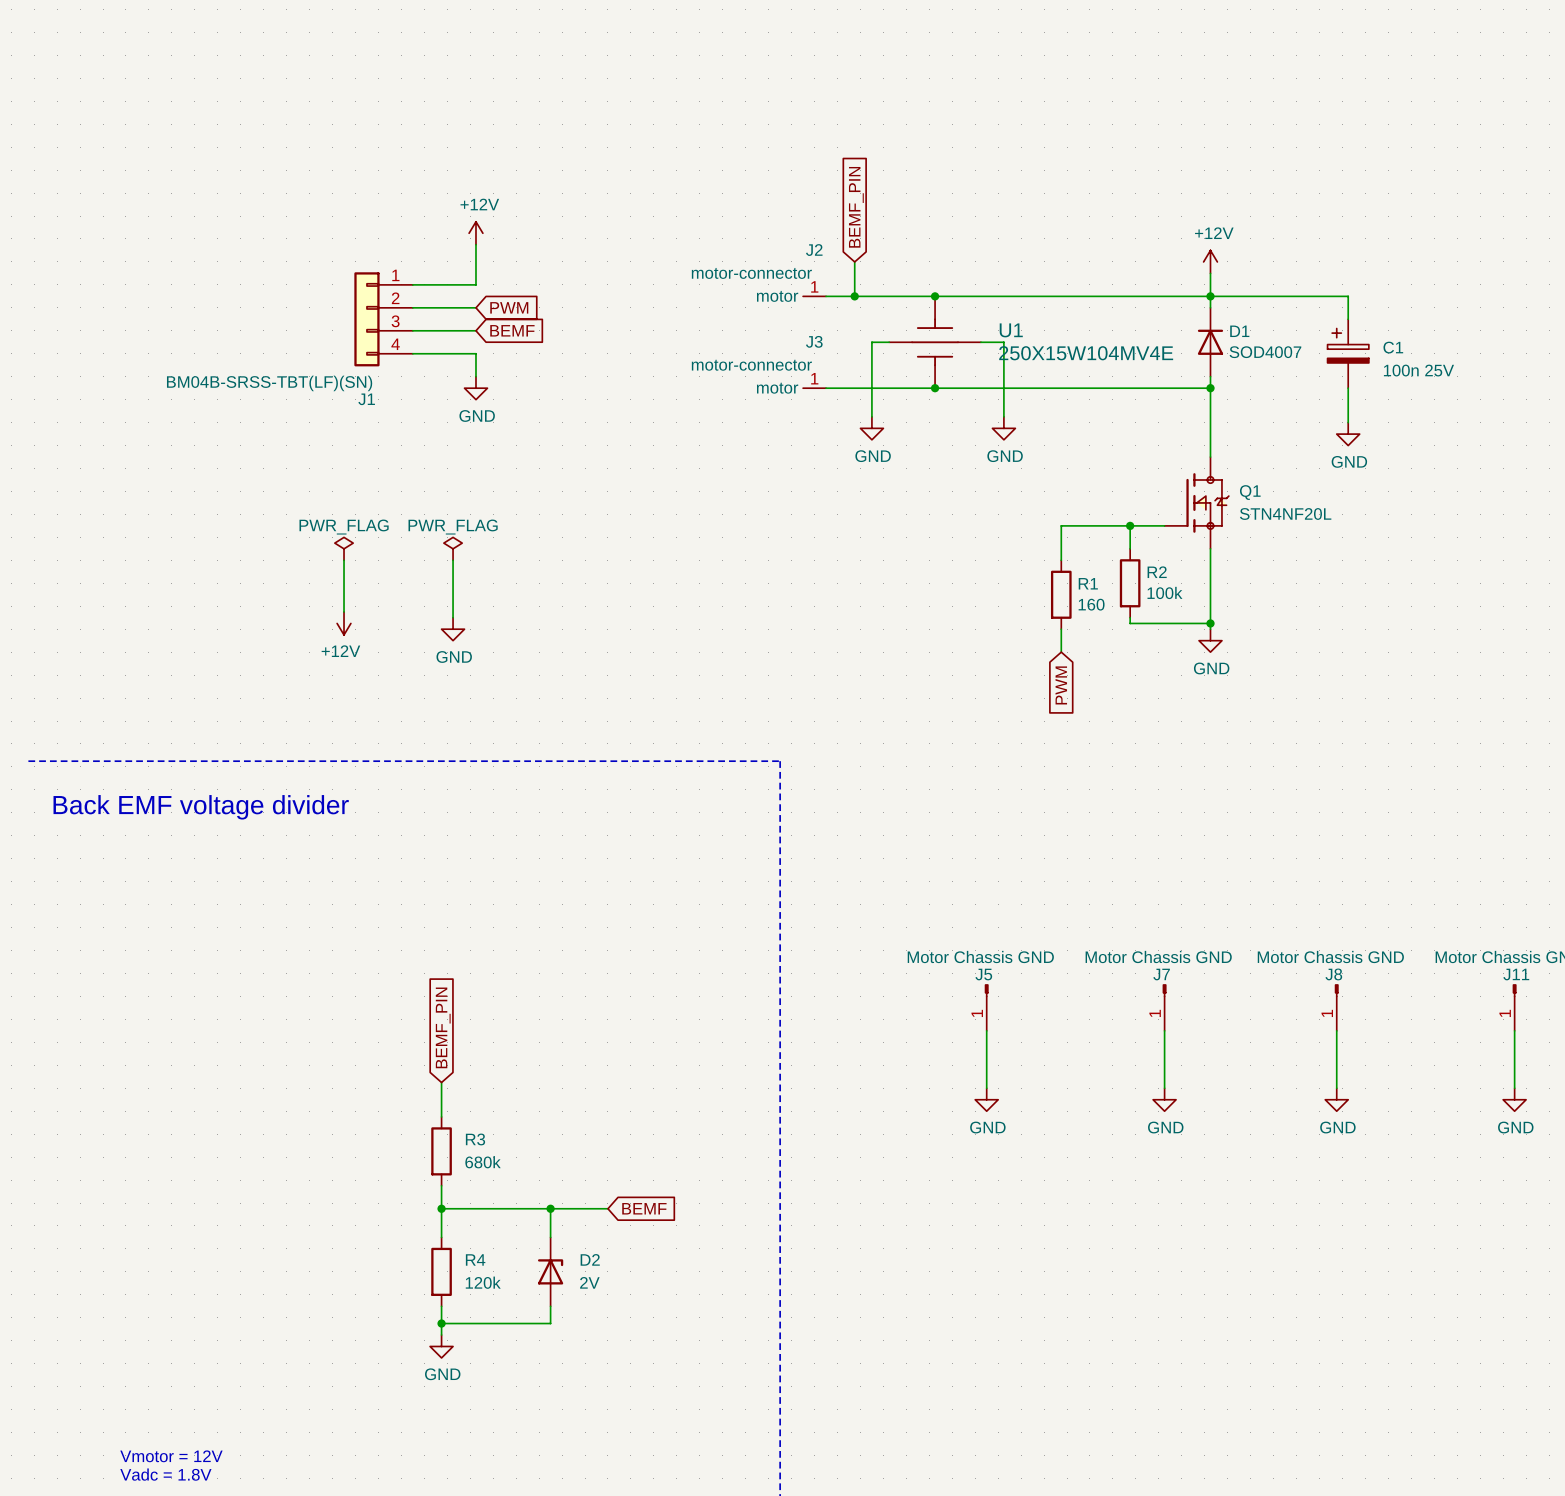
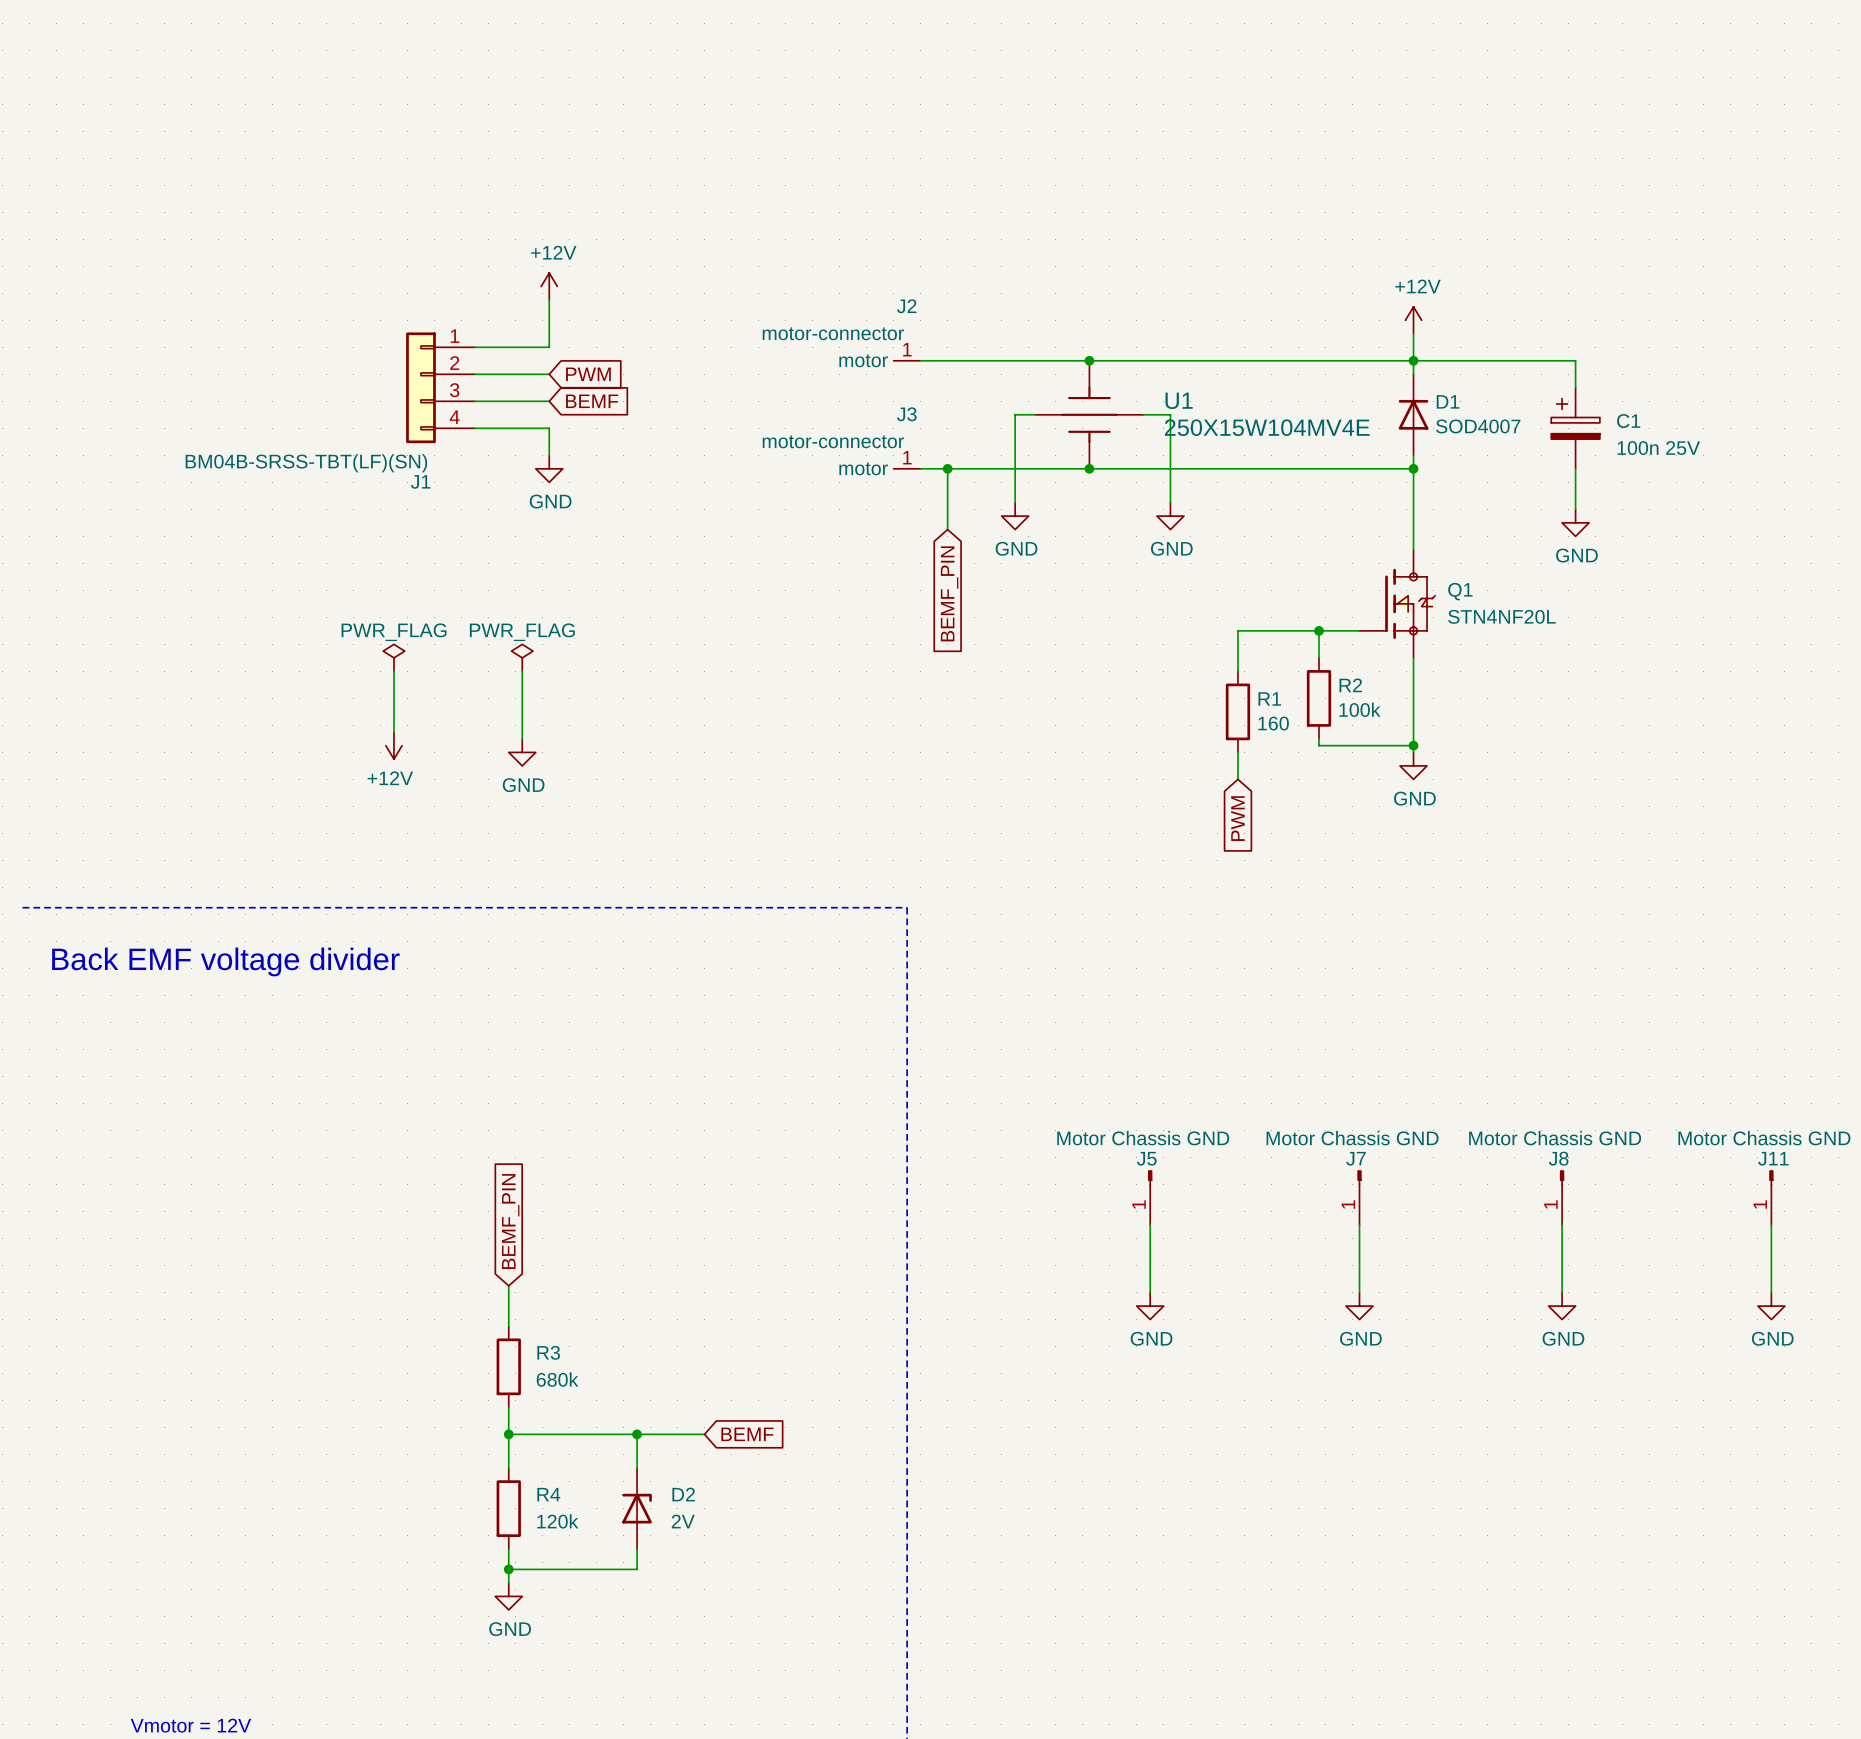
global label rotation: 0° (856, 207) -> 180° (949, 593)
global label position: BEMF_PIN (856, 207) -> BEMF_PIN (949, 593)
wire: (854, 261) (854, 296) -> none
J2 position: (814, 296) -> (907, 360)
junction: (854, 296) -> none
wire: none -> (947, 468) (947, 529)
junction: none -> (947, 468)
J3 position: (814, 388) -> (907, 468)

